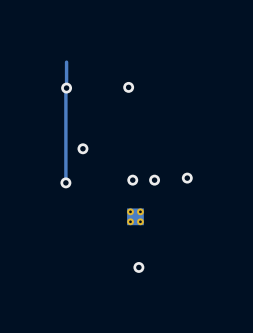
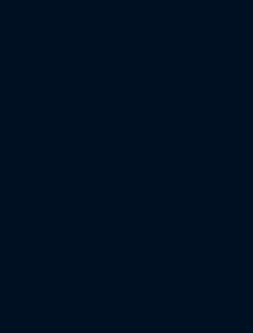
track: (66, 62) (65, 182) -> none
via: (128, 87) -> none
via: (66, 88) -> none
via: (82, 148) -> none
via: (187, 178) -> none
via: (132, 180) -> none
via: (154, 180) -> none
via: (65, 182) -> none
part: (135, 216) -> none
via: (138, 267) -> none

